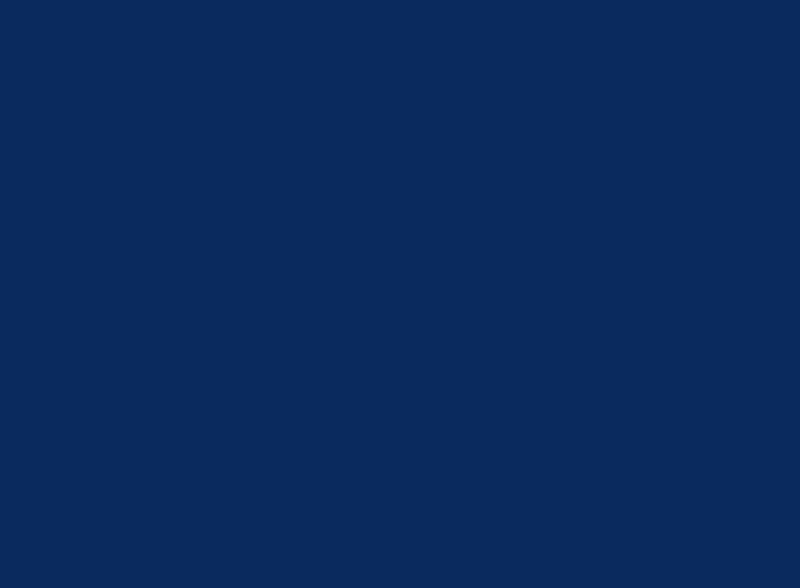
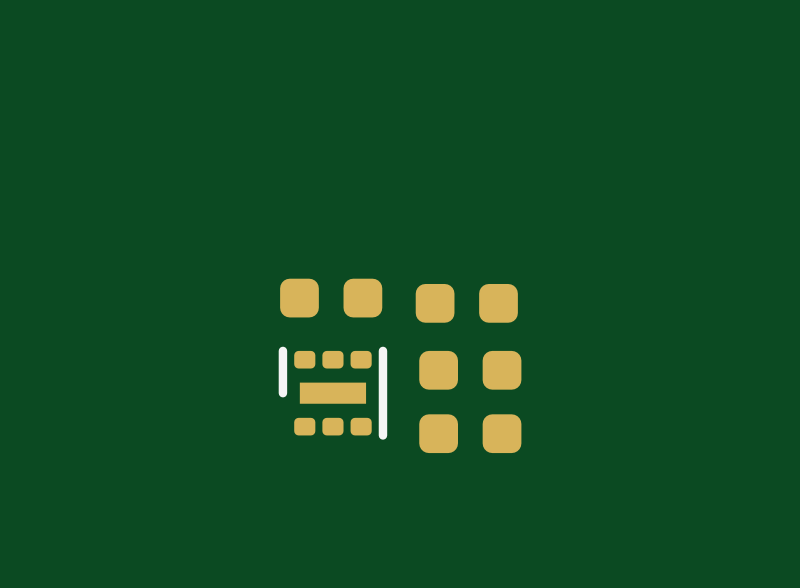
part: none -> (331, 298)
part: none -> (466, 303)
part: none -> (332, 393)
part: none -> (438, 401)
part: none -> (502, 401)

